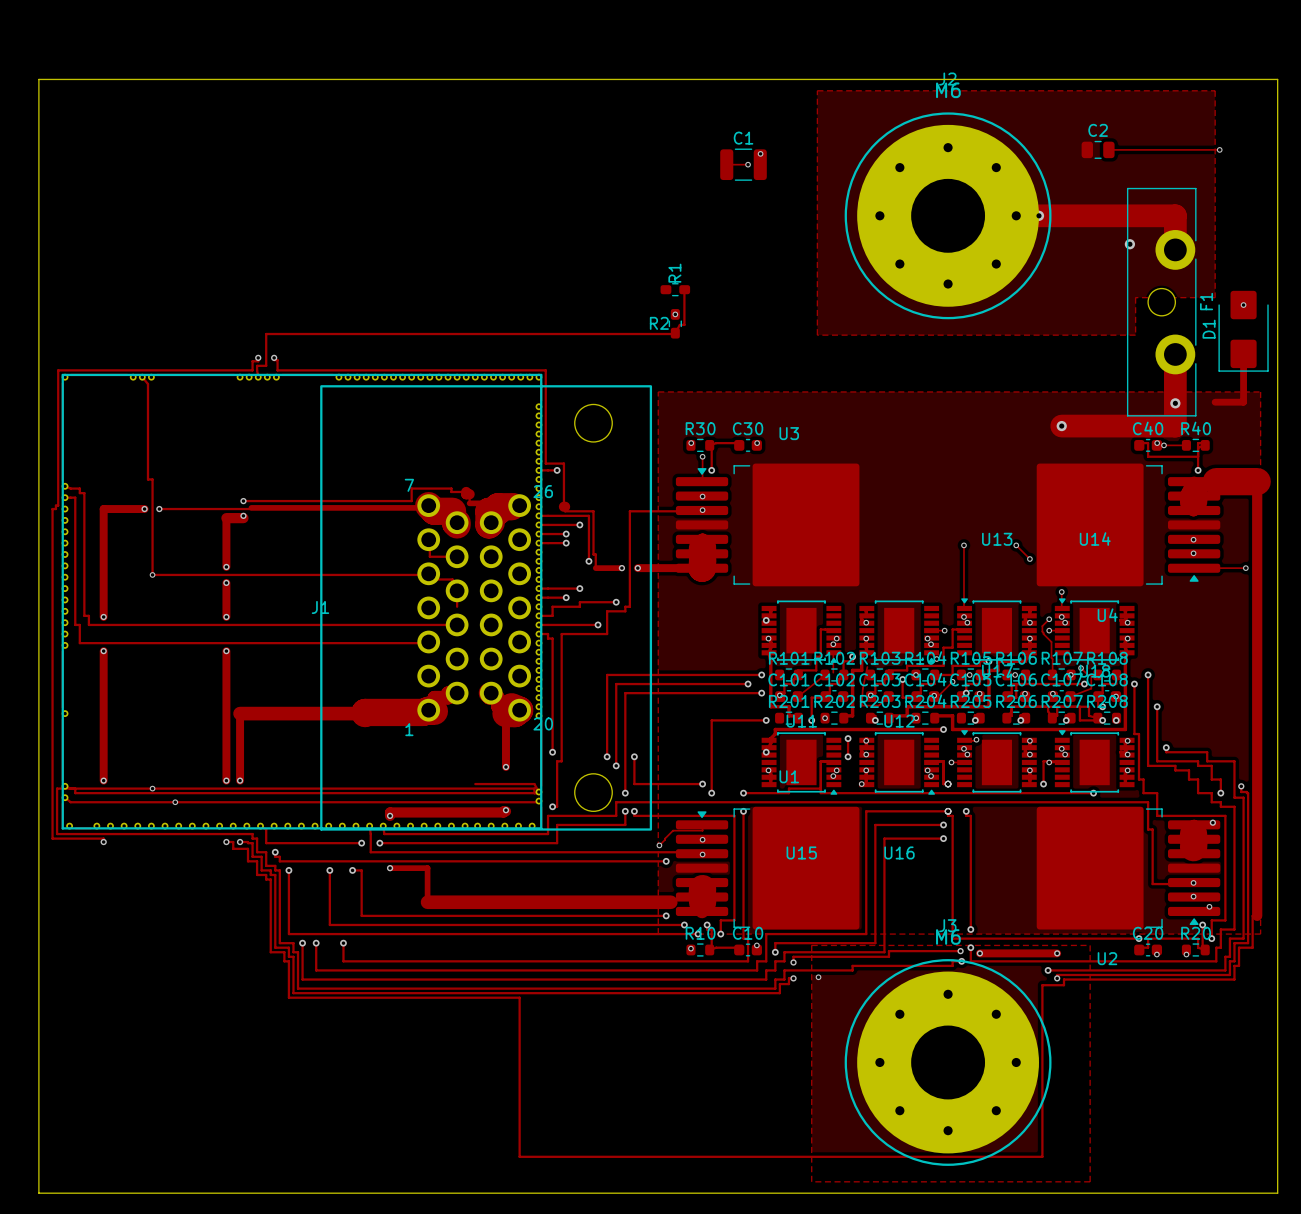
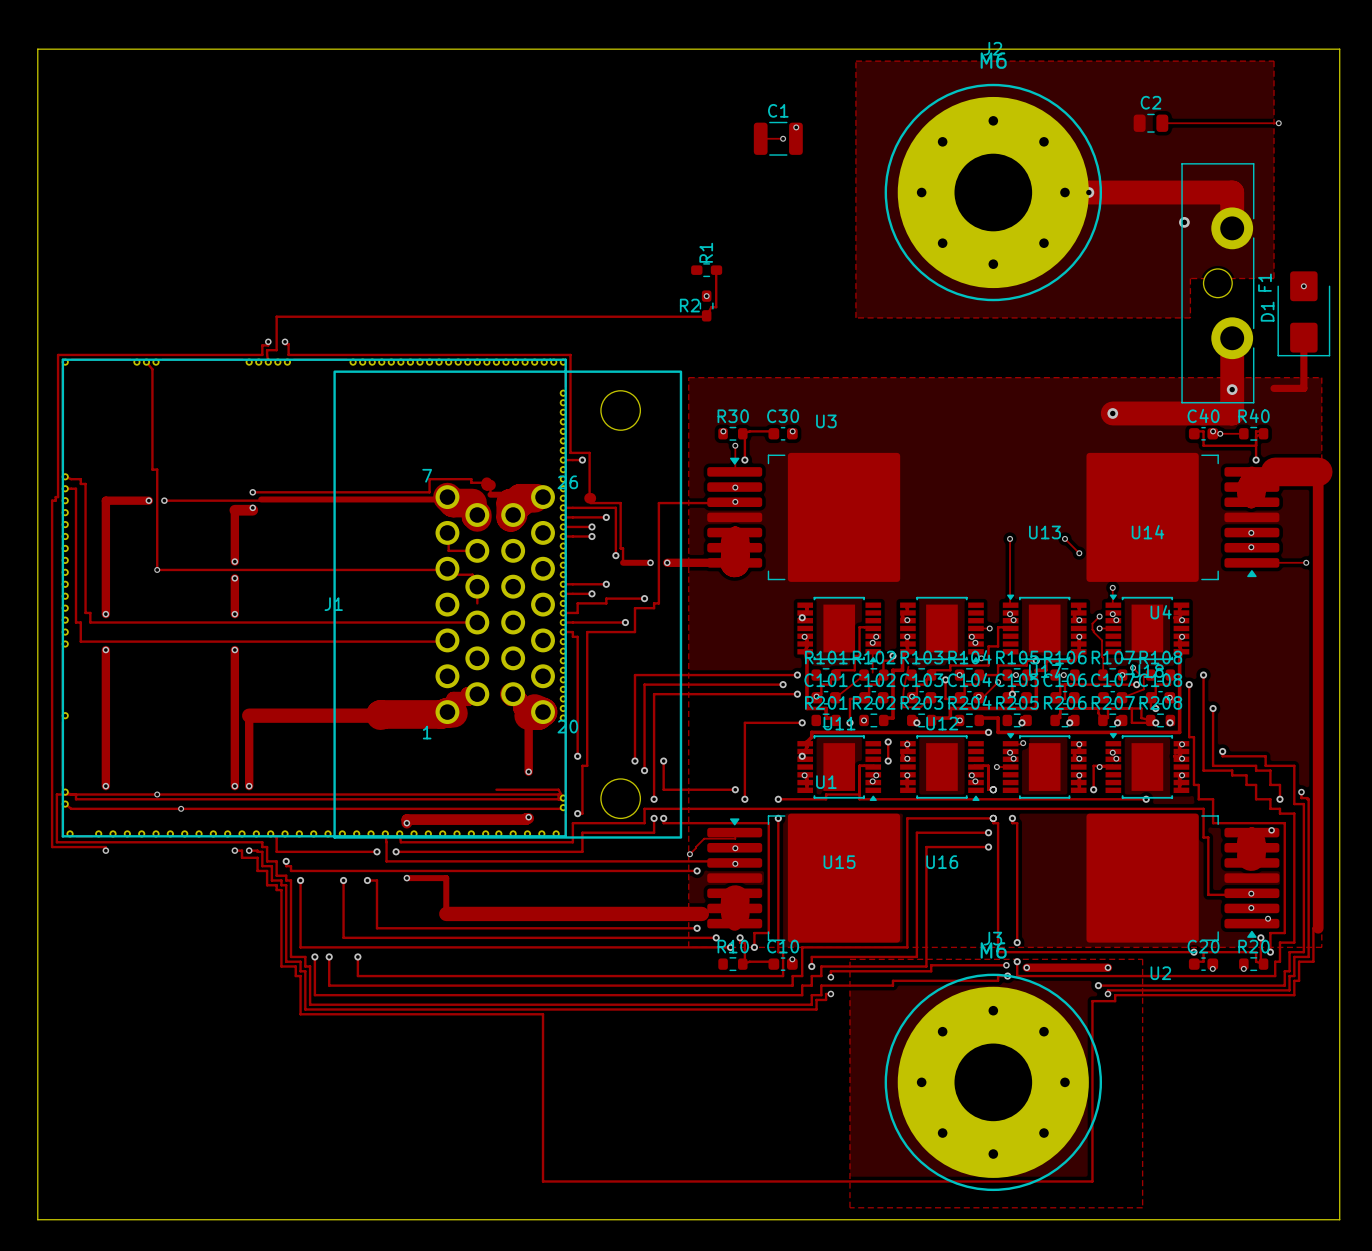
via: (979, 693) -> none
via: (1025, 693) -> none
via: (1052, 693) -> none
via: (861, 784) -> none
via: (690, 948) -> none
via: (818, 977) -> none

